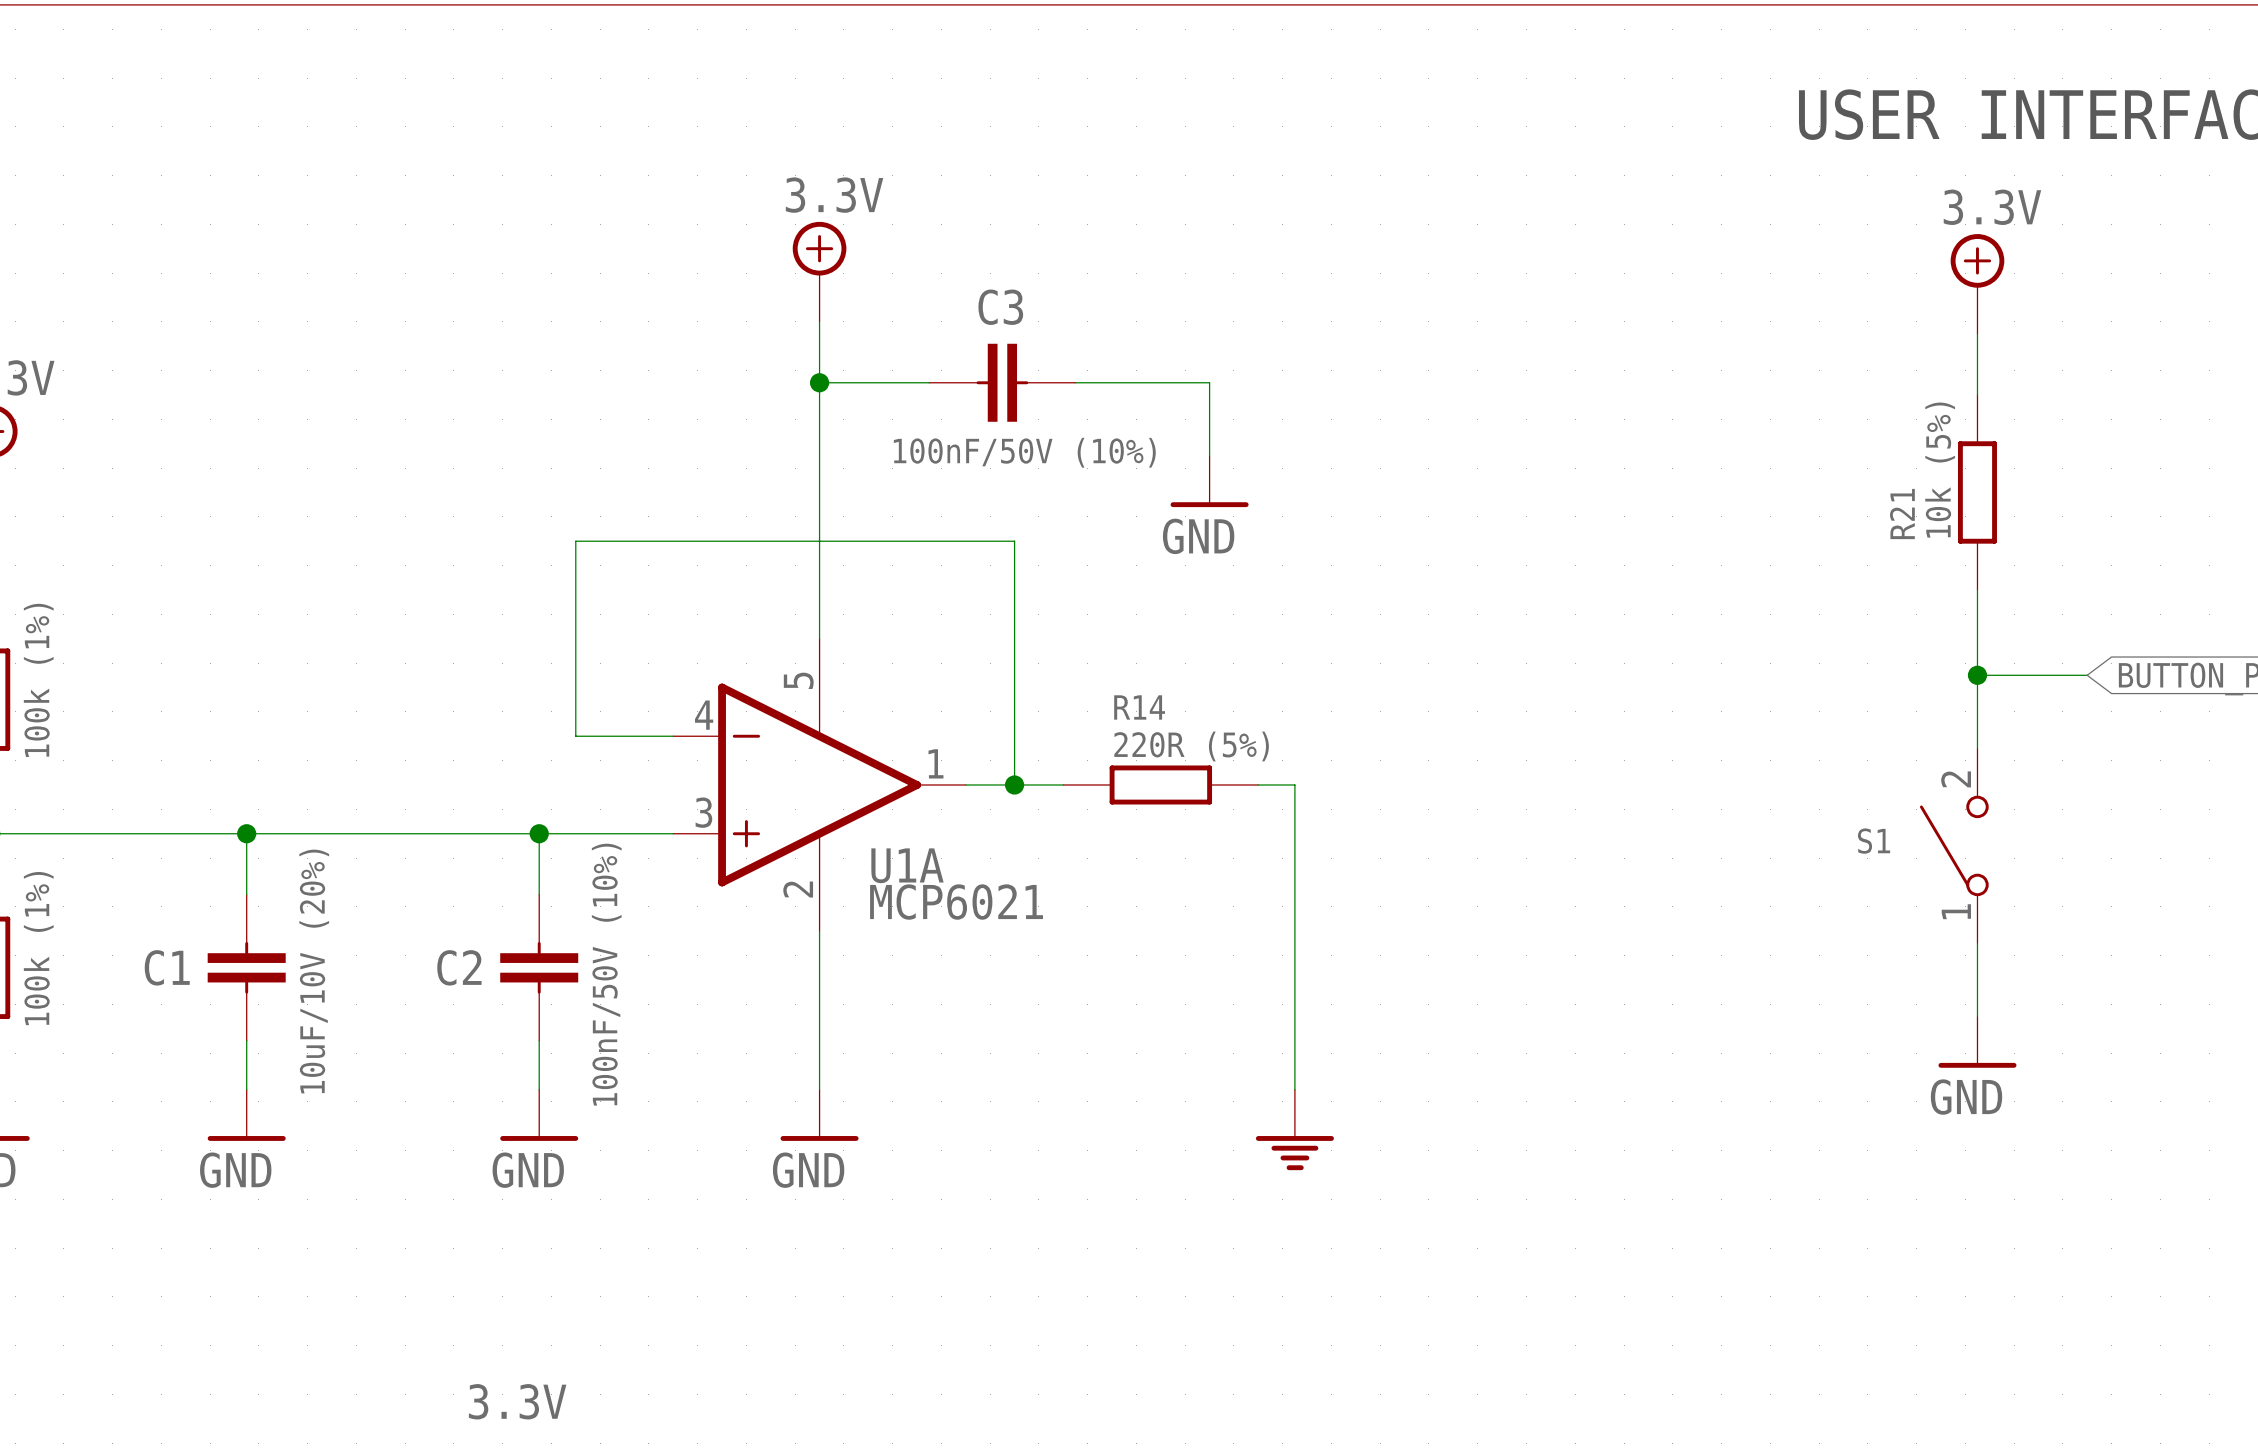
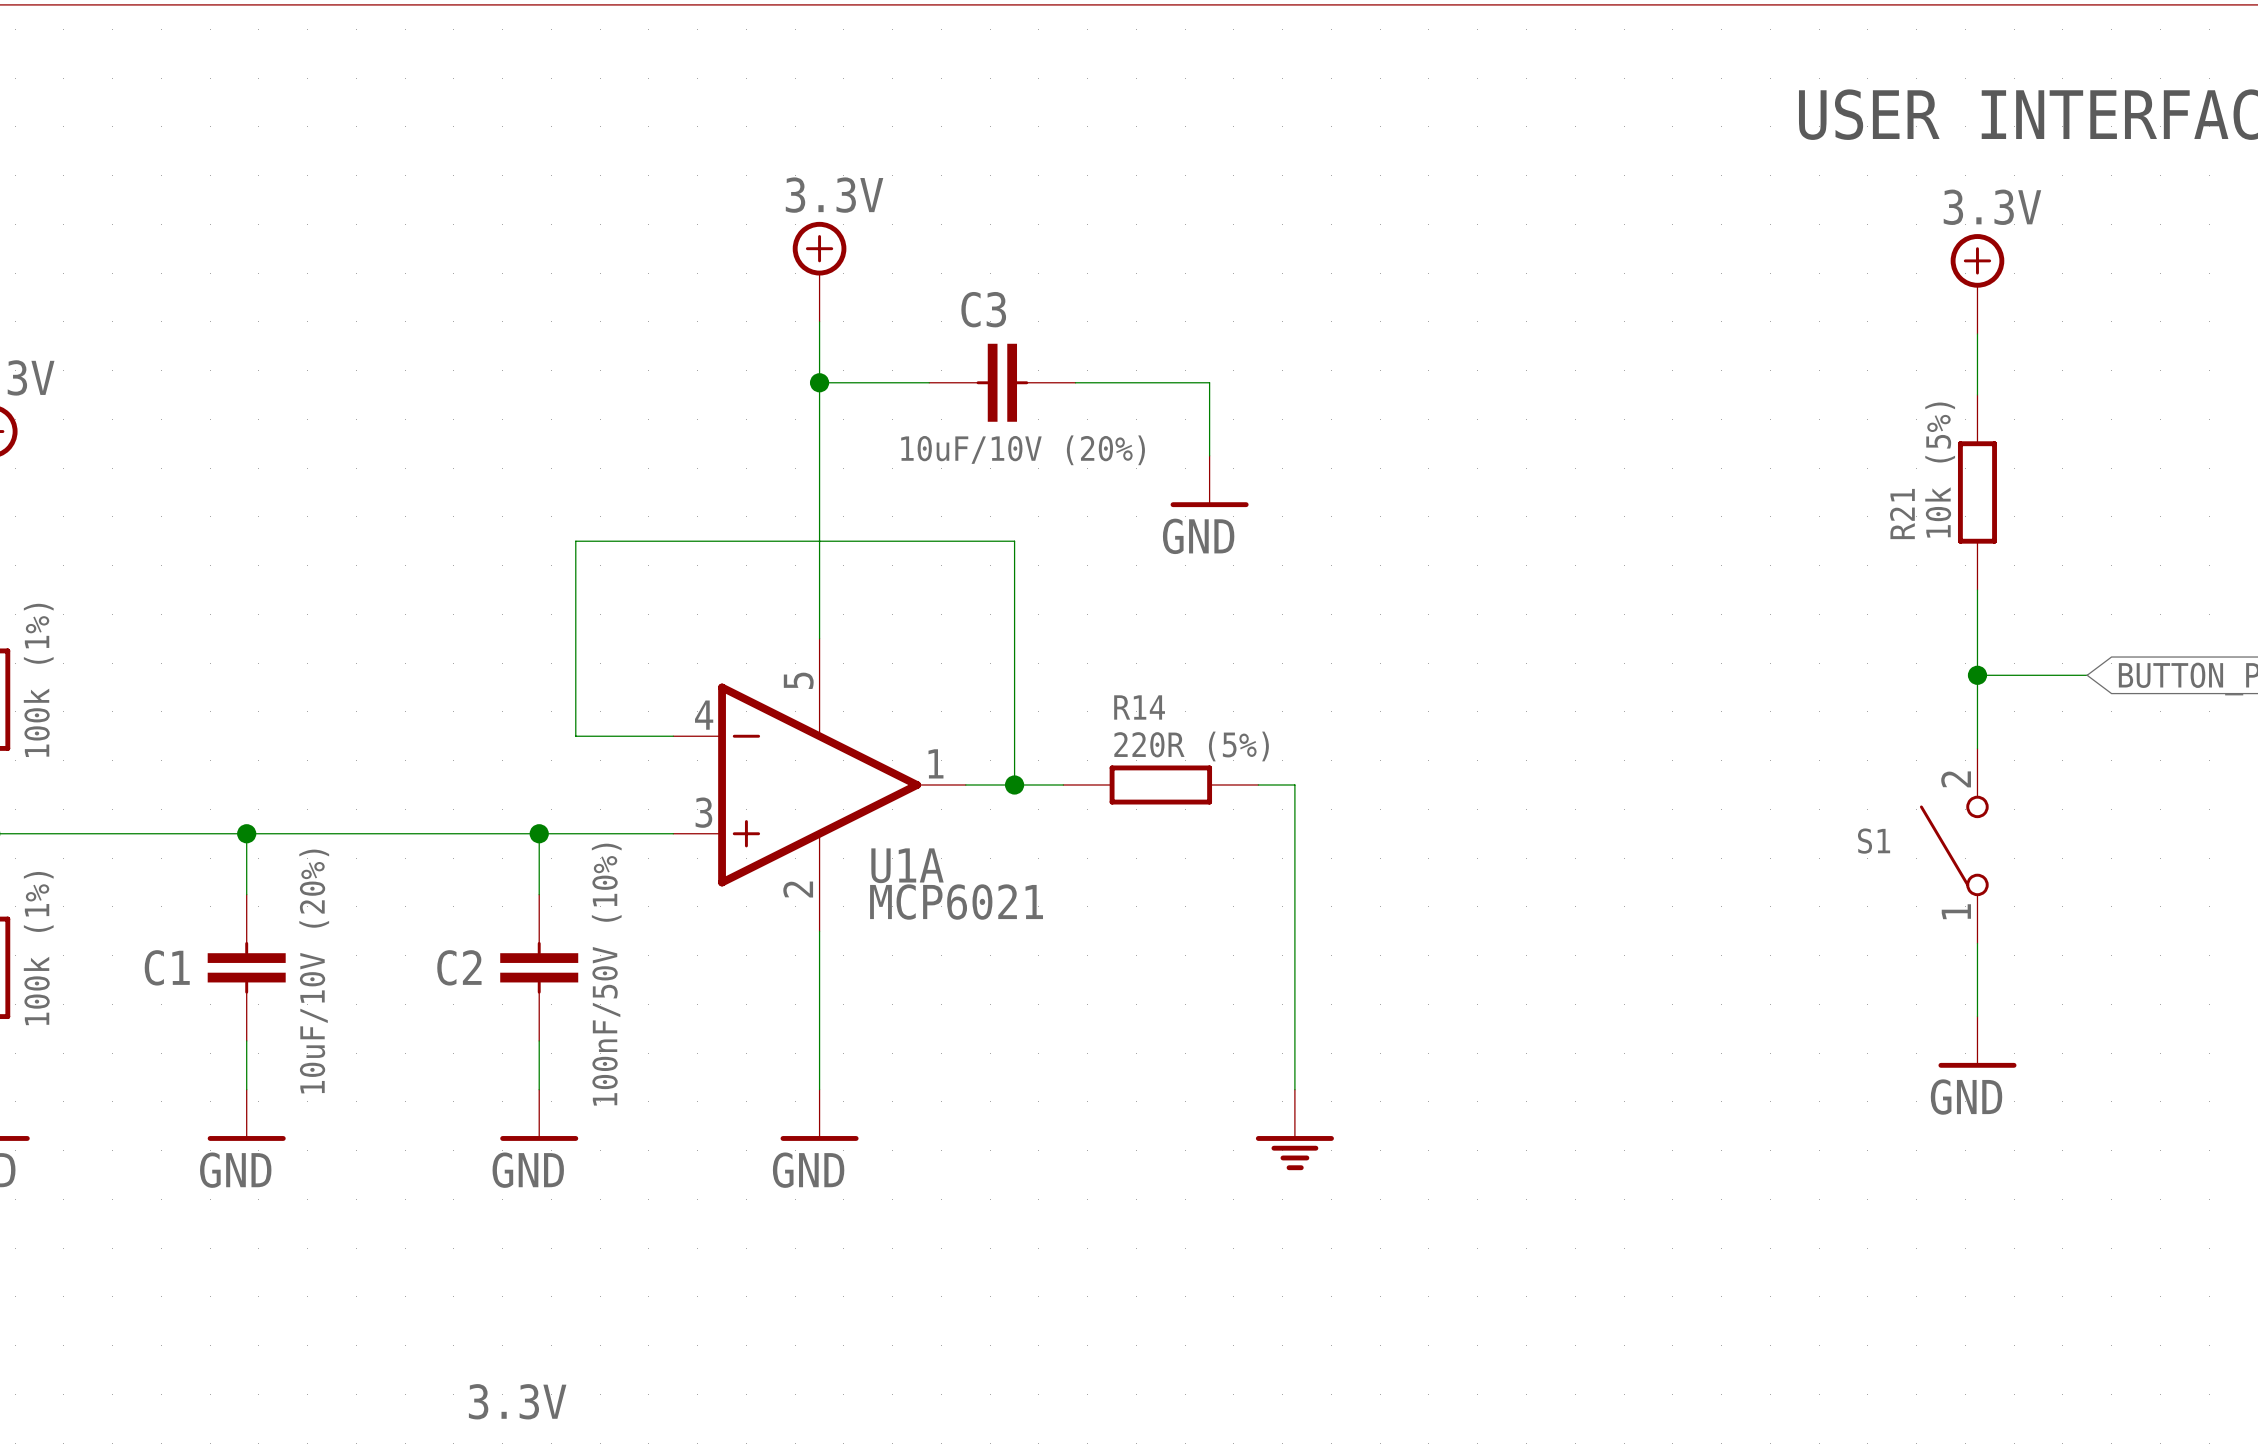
C3 name position: C3 (1000, 307) -> C3 (983, 309)
C3 value: 100nF/50V (10%) (1024, 452) -> 10uF/10V (20%) (1023, 450)

